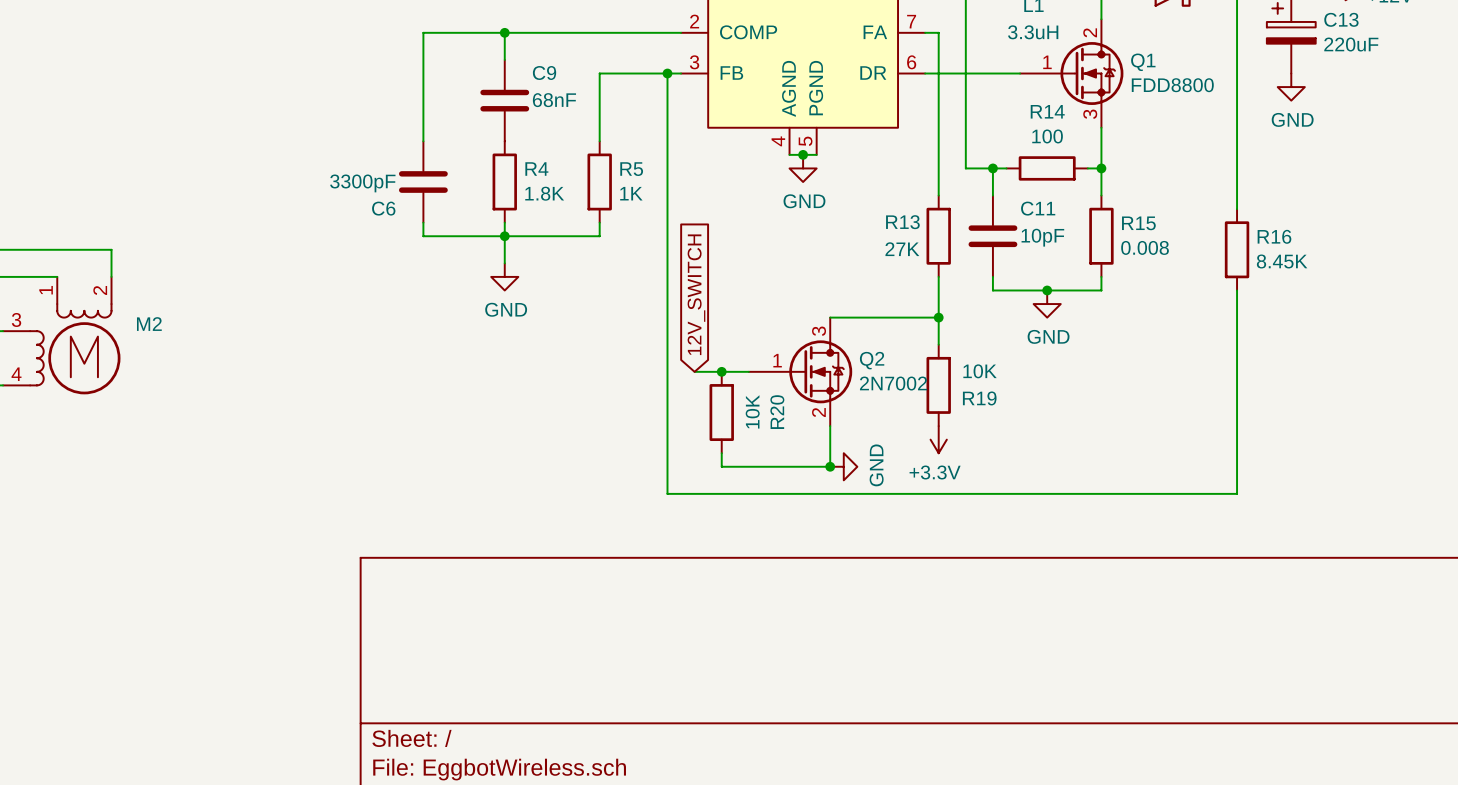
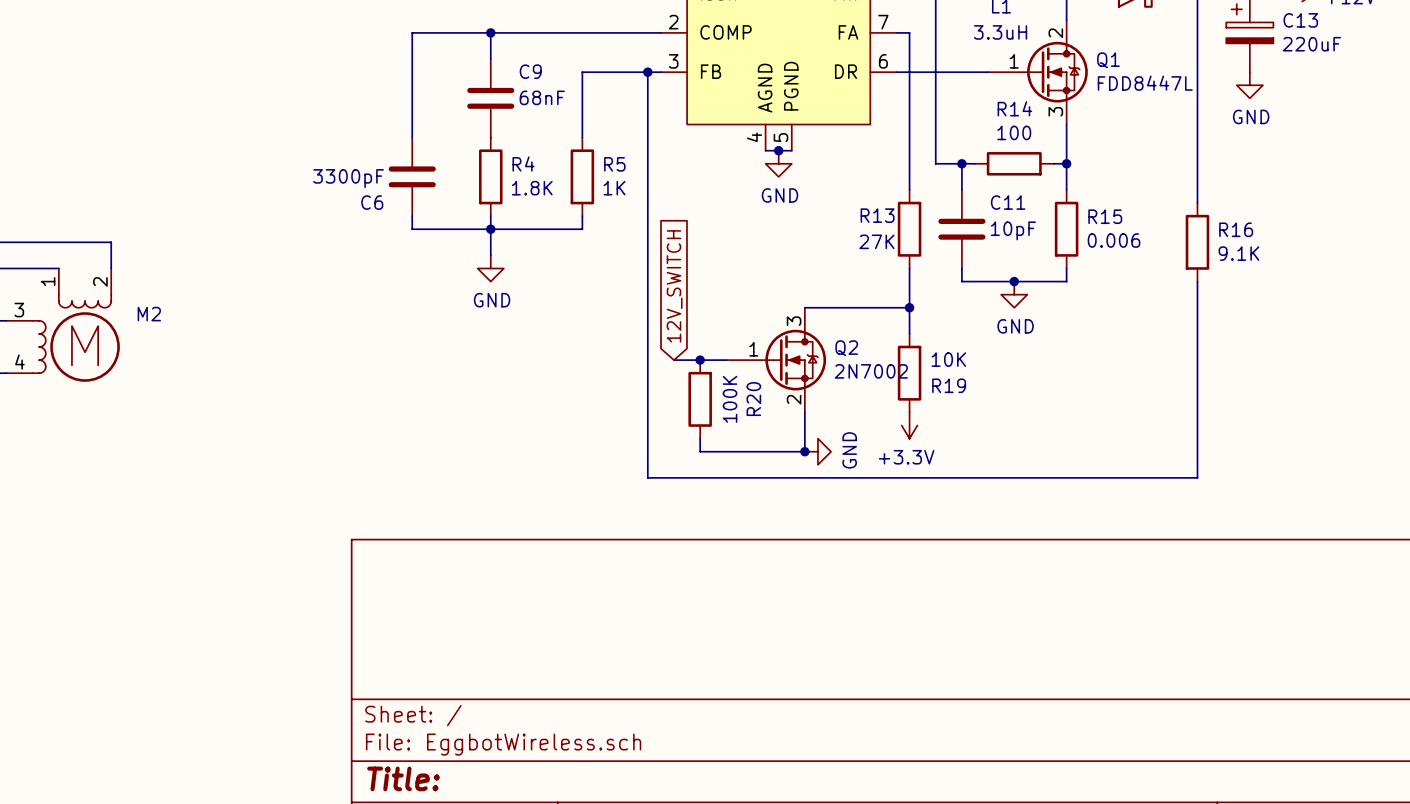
Q1 value: FDD8800 (1172, 85) -> FDD8447L (1145, 83)
R15 value: 0.008 (1145, 247) -> 0.006 (1114, 240)
R16 value: 8.45K (1282, 261) -> 9.1K (1238, 253)
R20 value: 10K (752, 411) -> 100K (730, 399)

